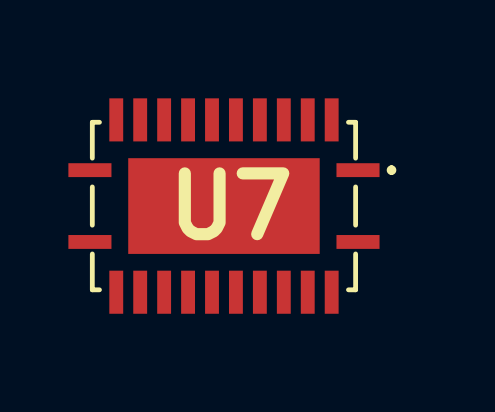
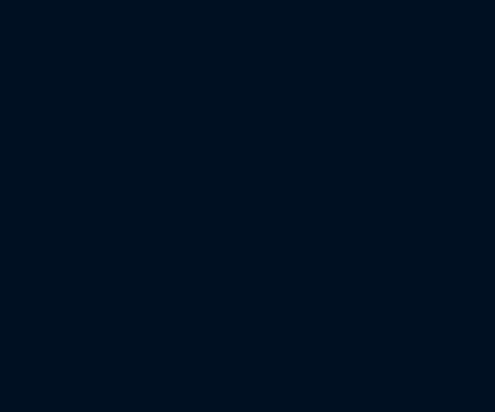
U7: (232, 206) -> none

